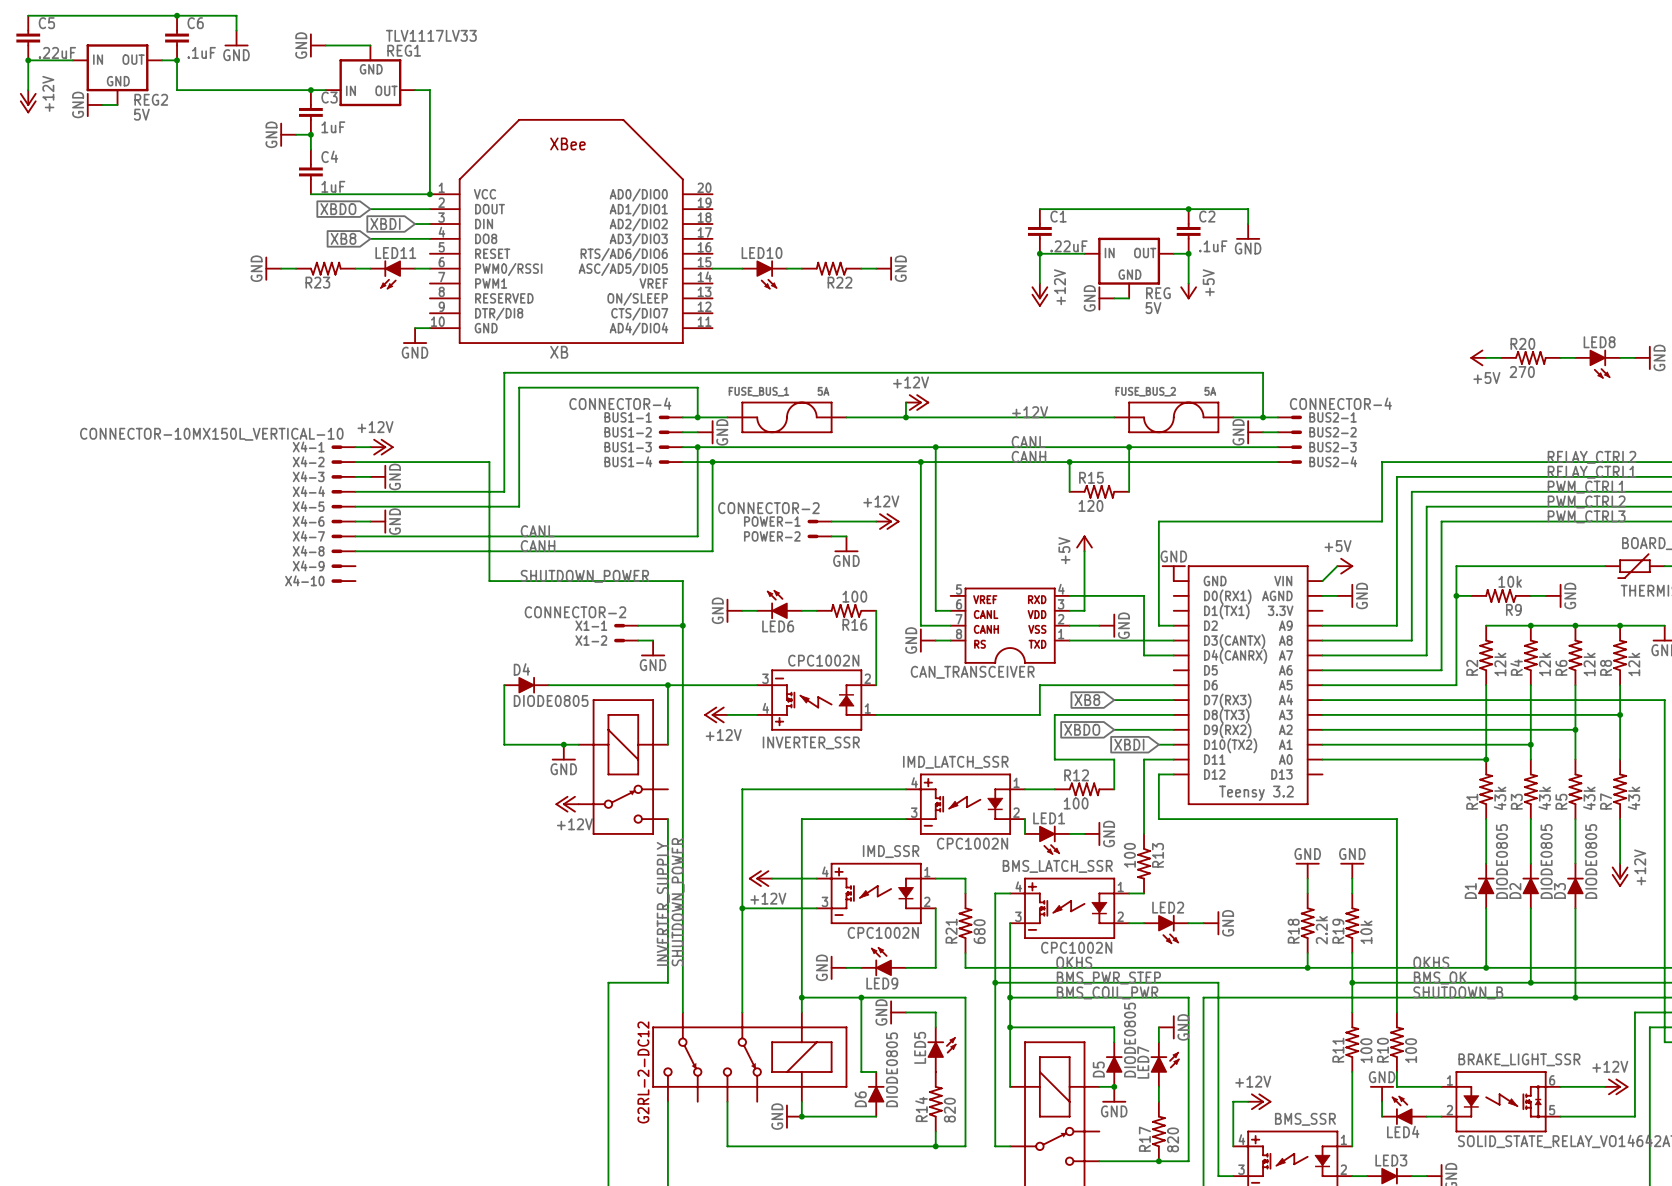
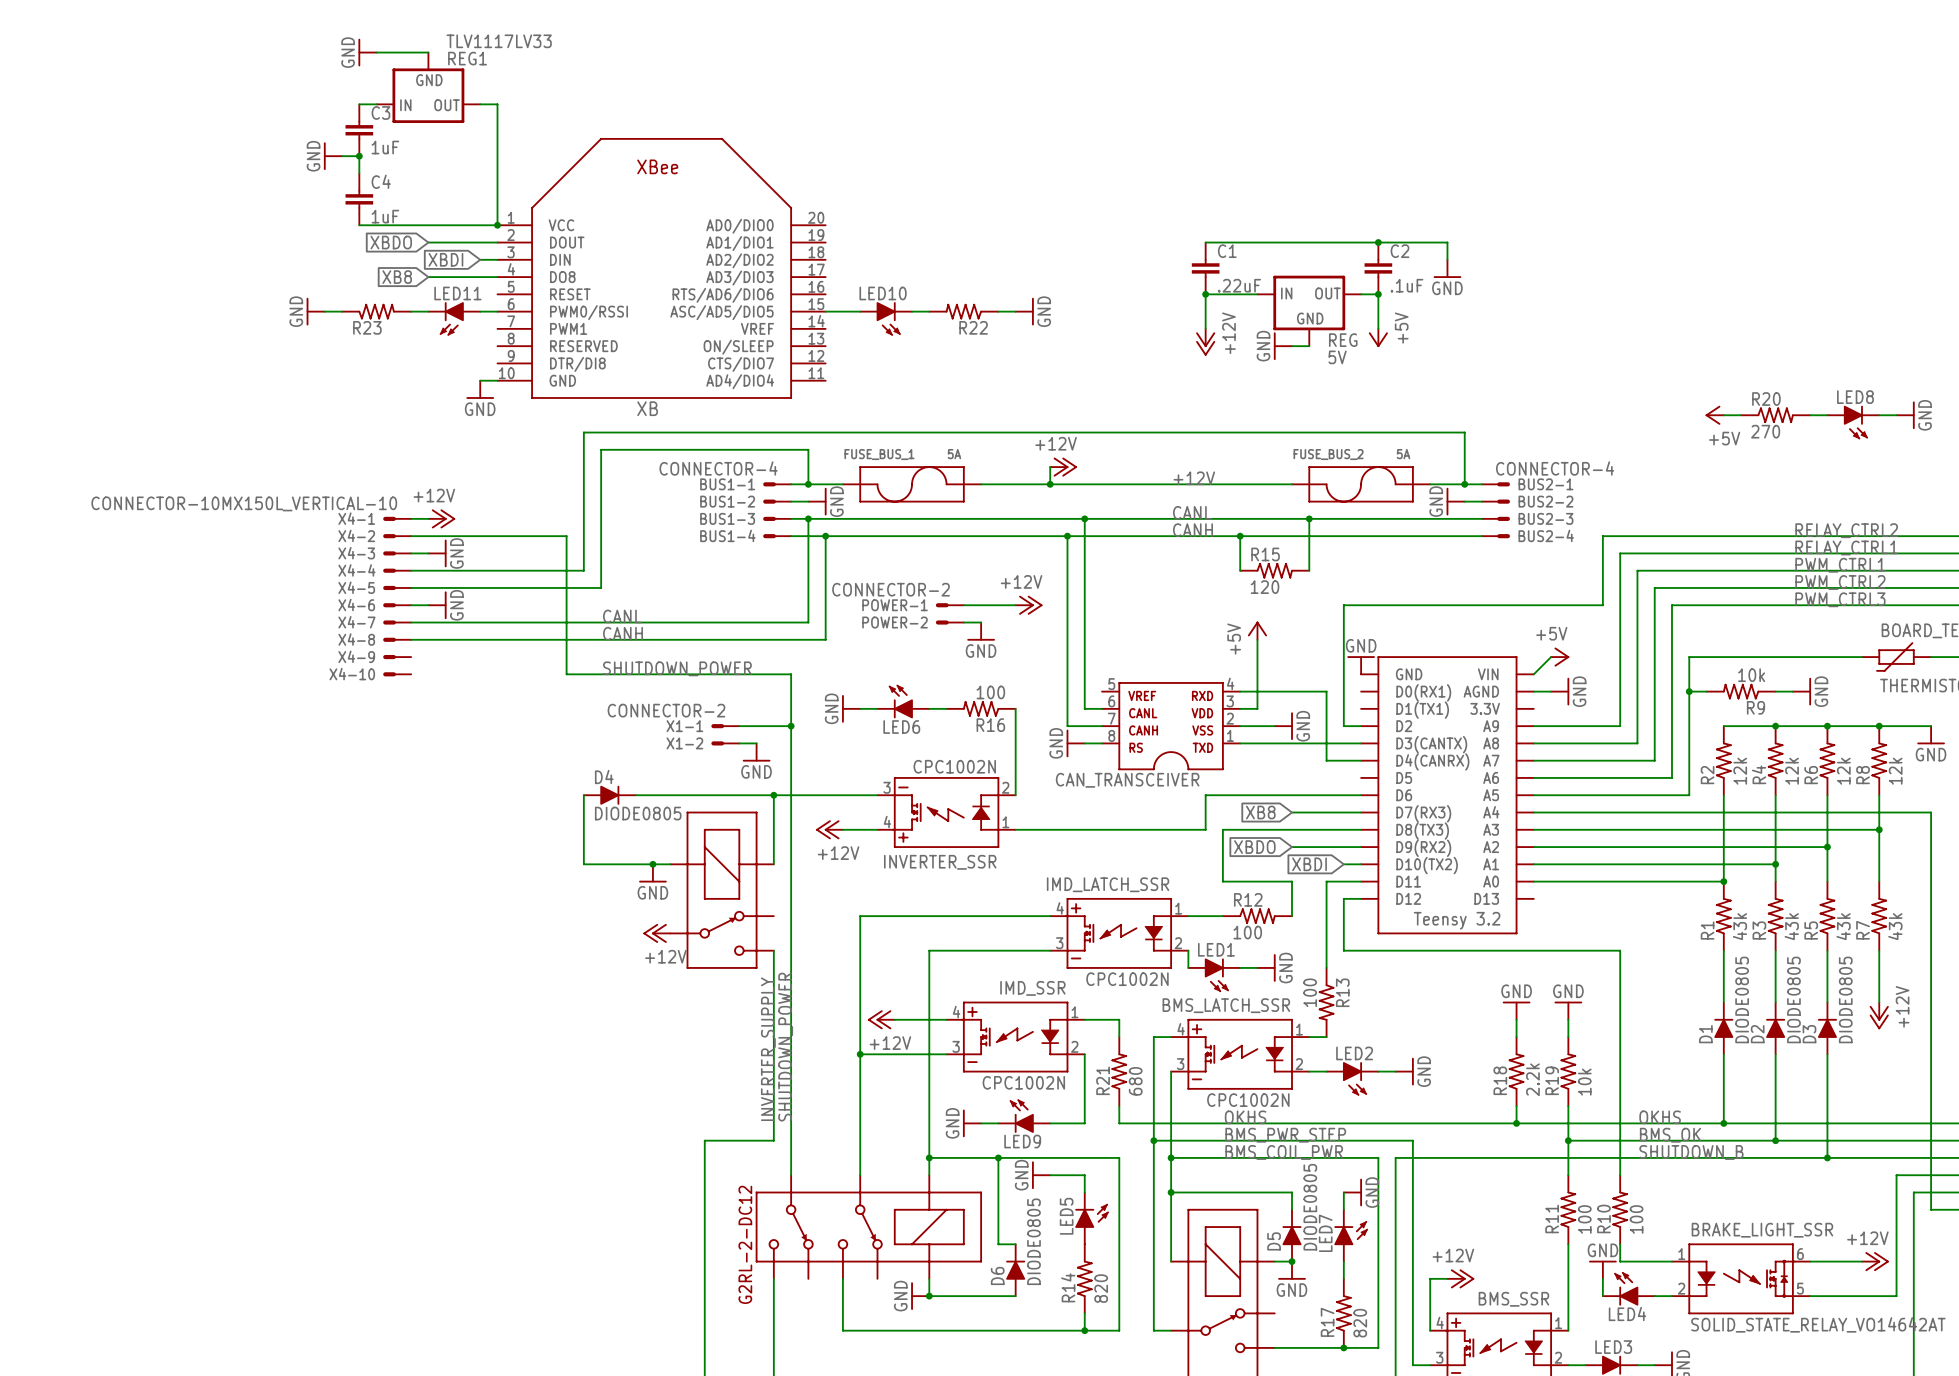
wire: (28, 15) (236, 15) (236, 30) -> none
junction: (177, 15) -> none
C5: .22uF (28, 38) -> none
C6: .1uF (177, 38) -> none
power symbol: GND (236, 38) -> none
junction: (28, 60) -> none
wire: (72, 60) (28, 60) (28, 90) -> none
wire: (162, 60) (177, 60) (177, 90) (310, 90) -> none
junction: (177, 60) -> none
REG2: 5V (117, 74) -> none
junction: (310, 90) -> none
power symbol: +12V (28, 101) -> none
power symbol: GND (94, 104) -> none
wire: (102, 104) (117, 104) -> none

